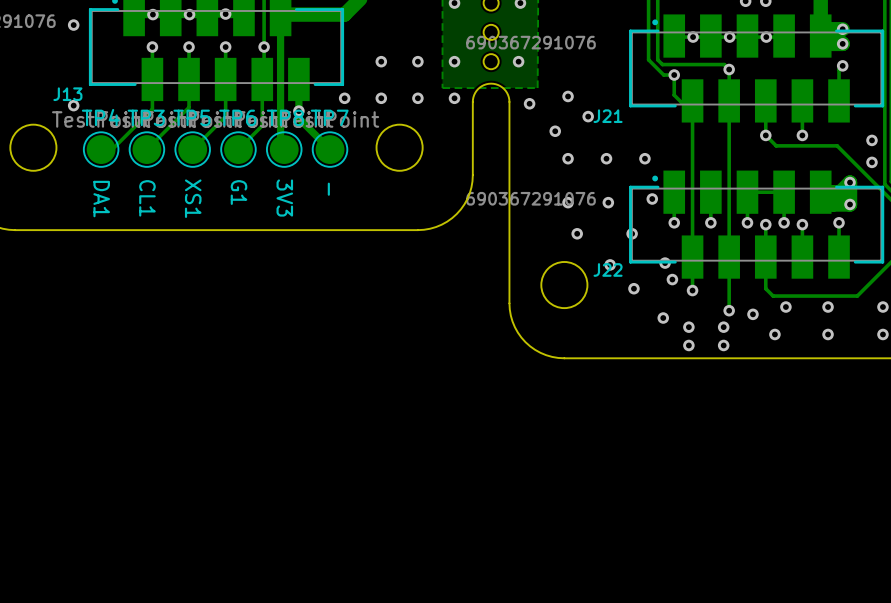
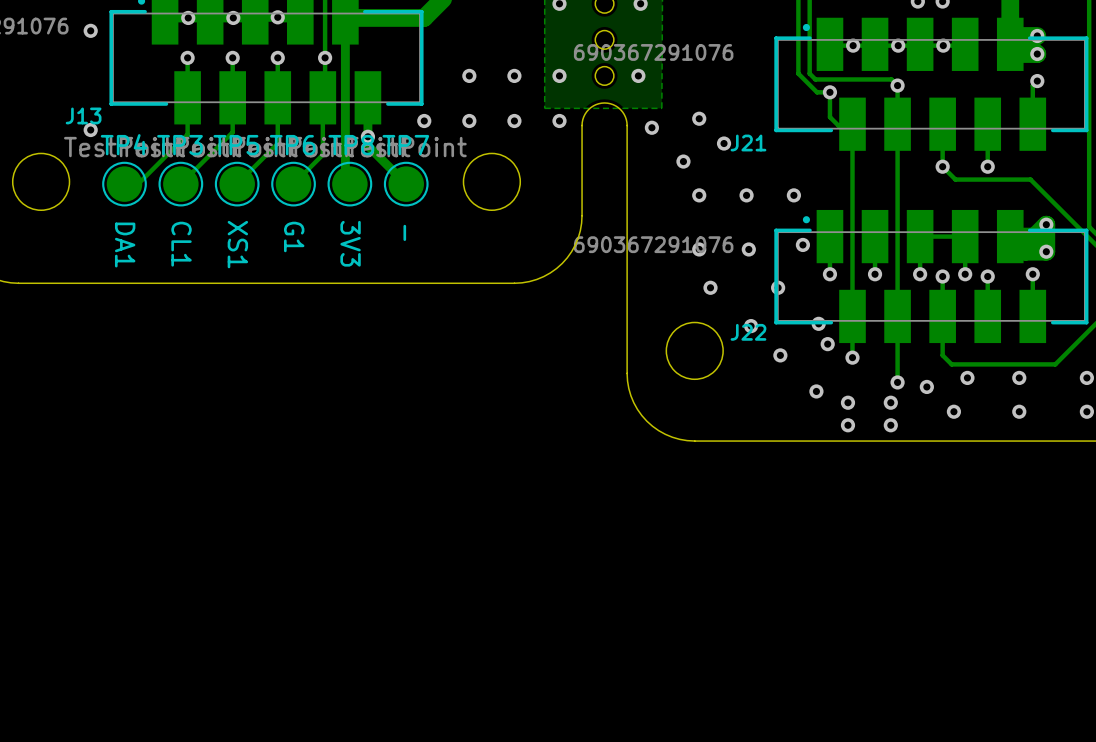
via: (871, 140) -> none
via: (871, 162) -> none

